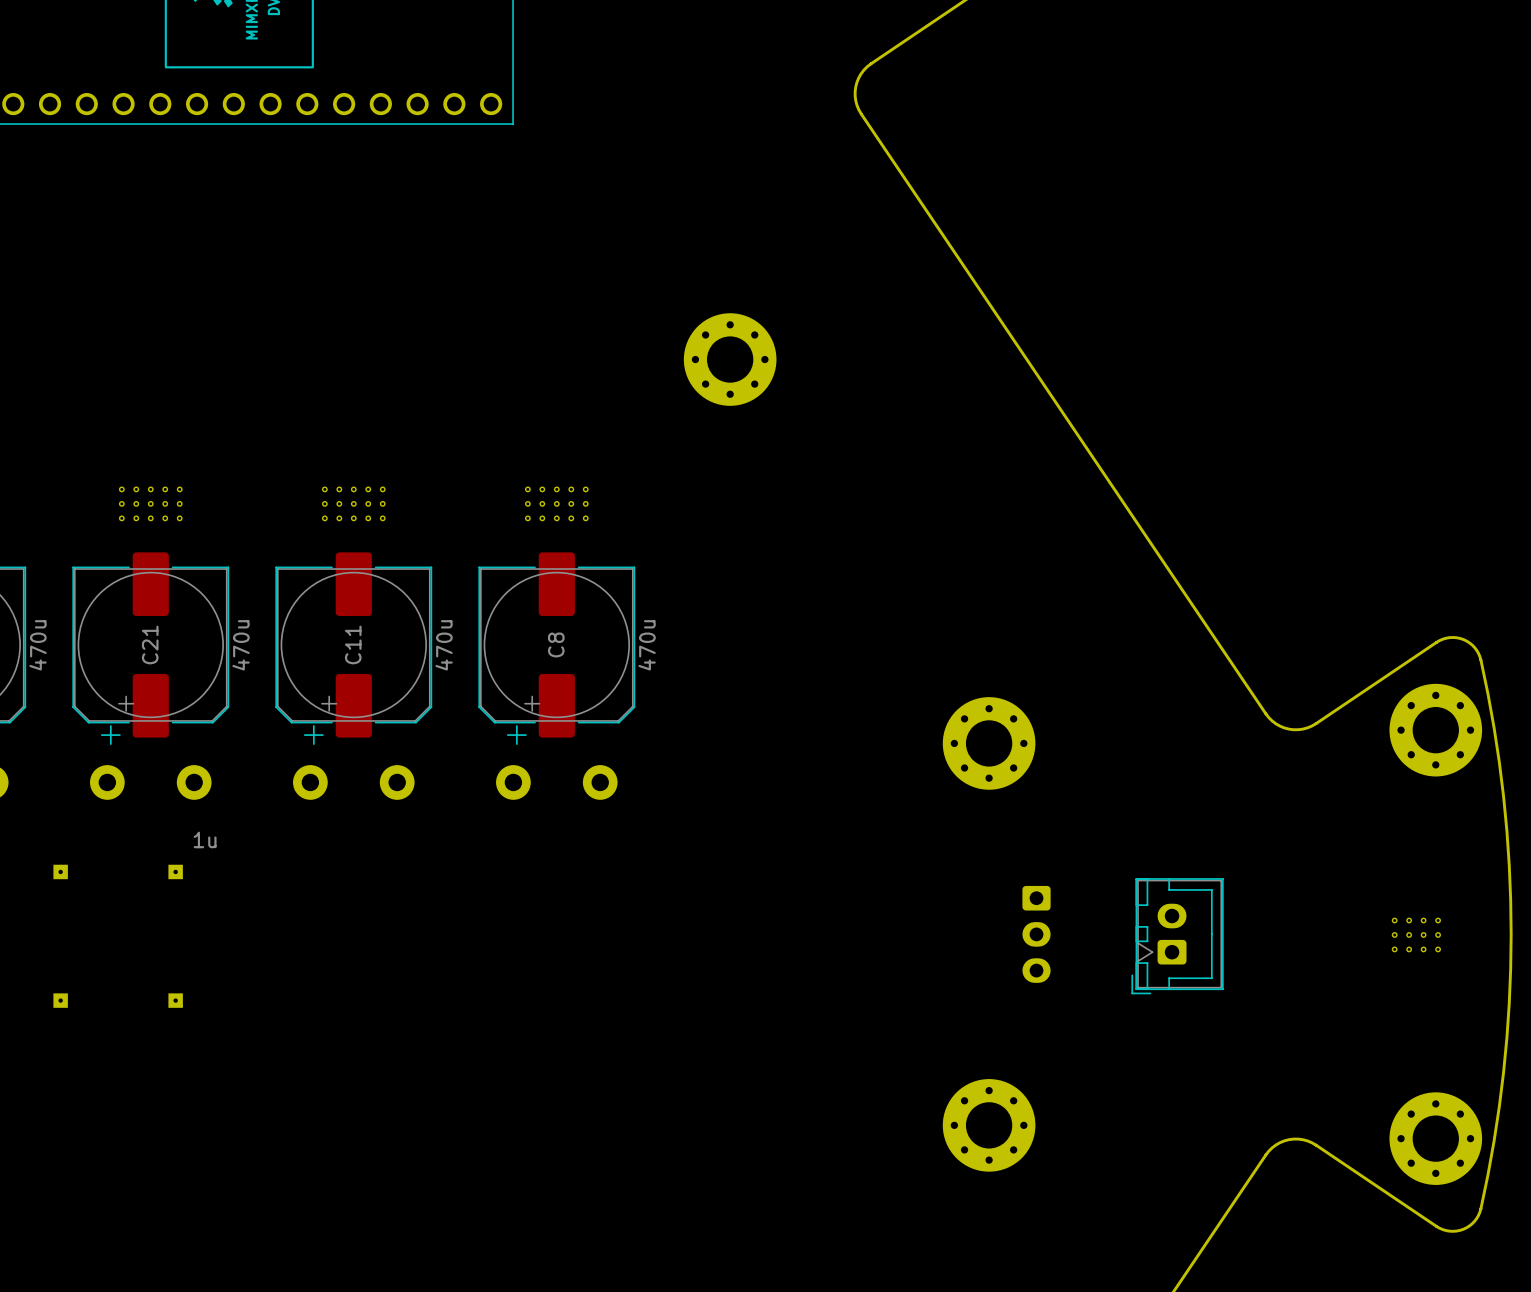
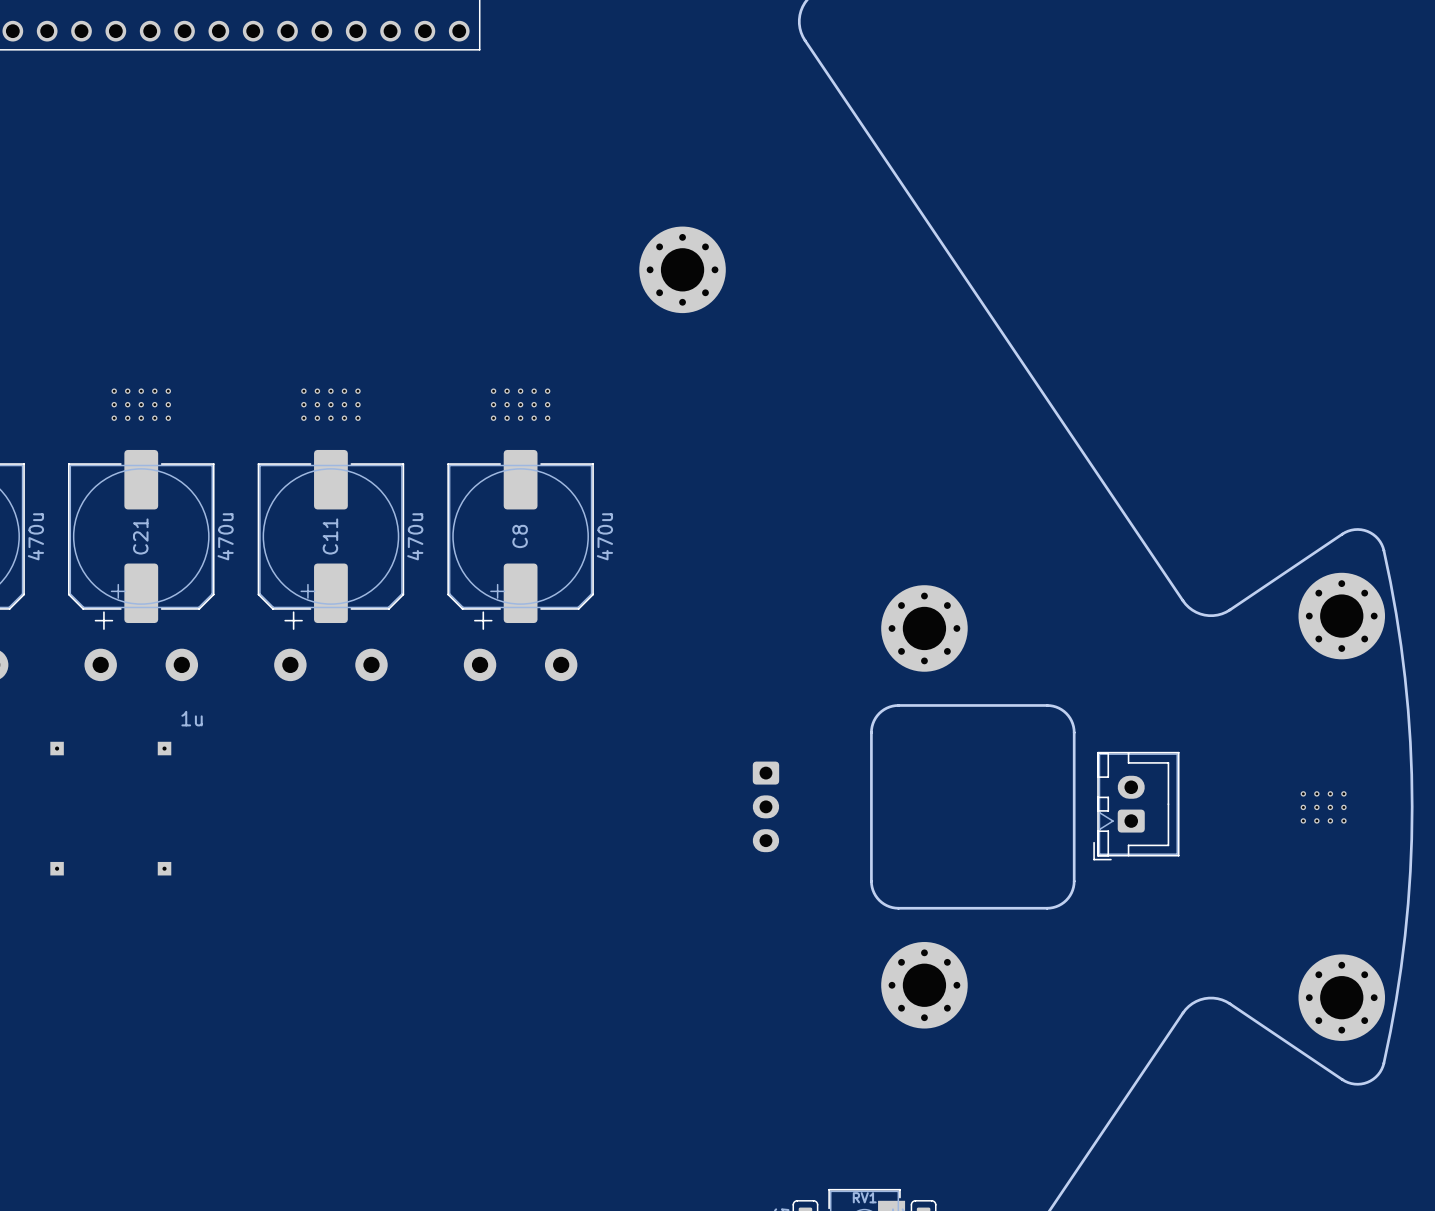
board edge: none -> (898, 705) (1050, 705) (1058, 708) (1068, 715) (1072, 723) (1074, 732) (1074, 881) (1071, 892) (1064, 902) (1056, 906) (1047, 908) (898, 908) (886, 905) (877, 898) (872, 890) (871, 881) (871, 729) (874, 720) (879, 713) (886, 708) (898, 705)
part position: (1036, 934) -> (765, 806)
part position: (1177, 936) -> (1136, 806)

